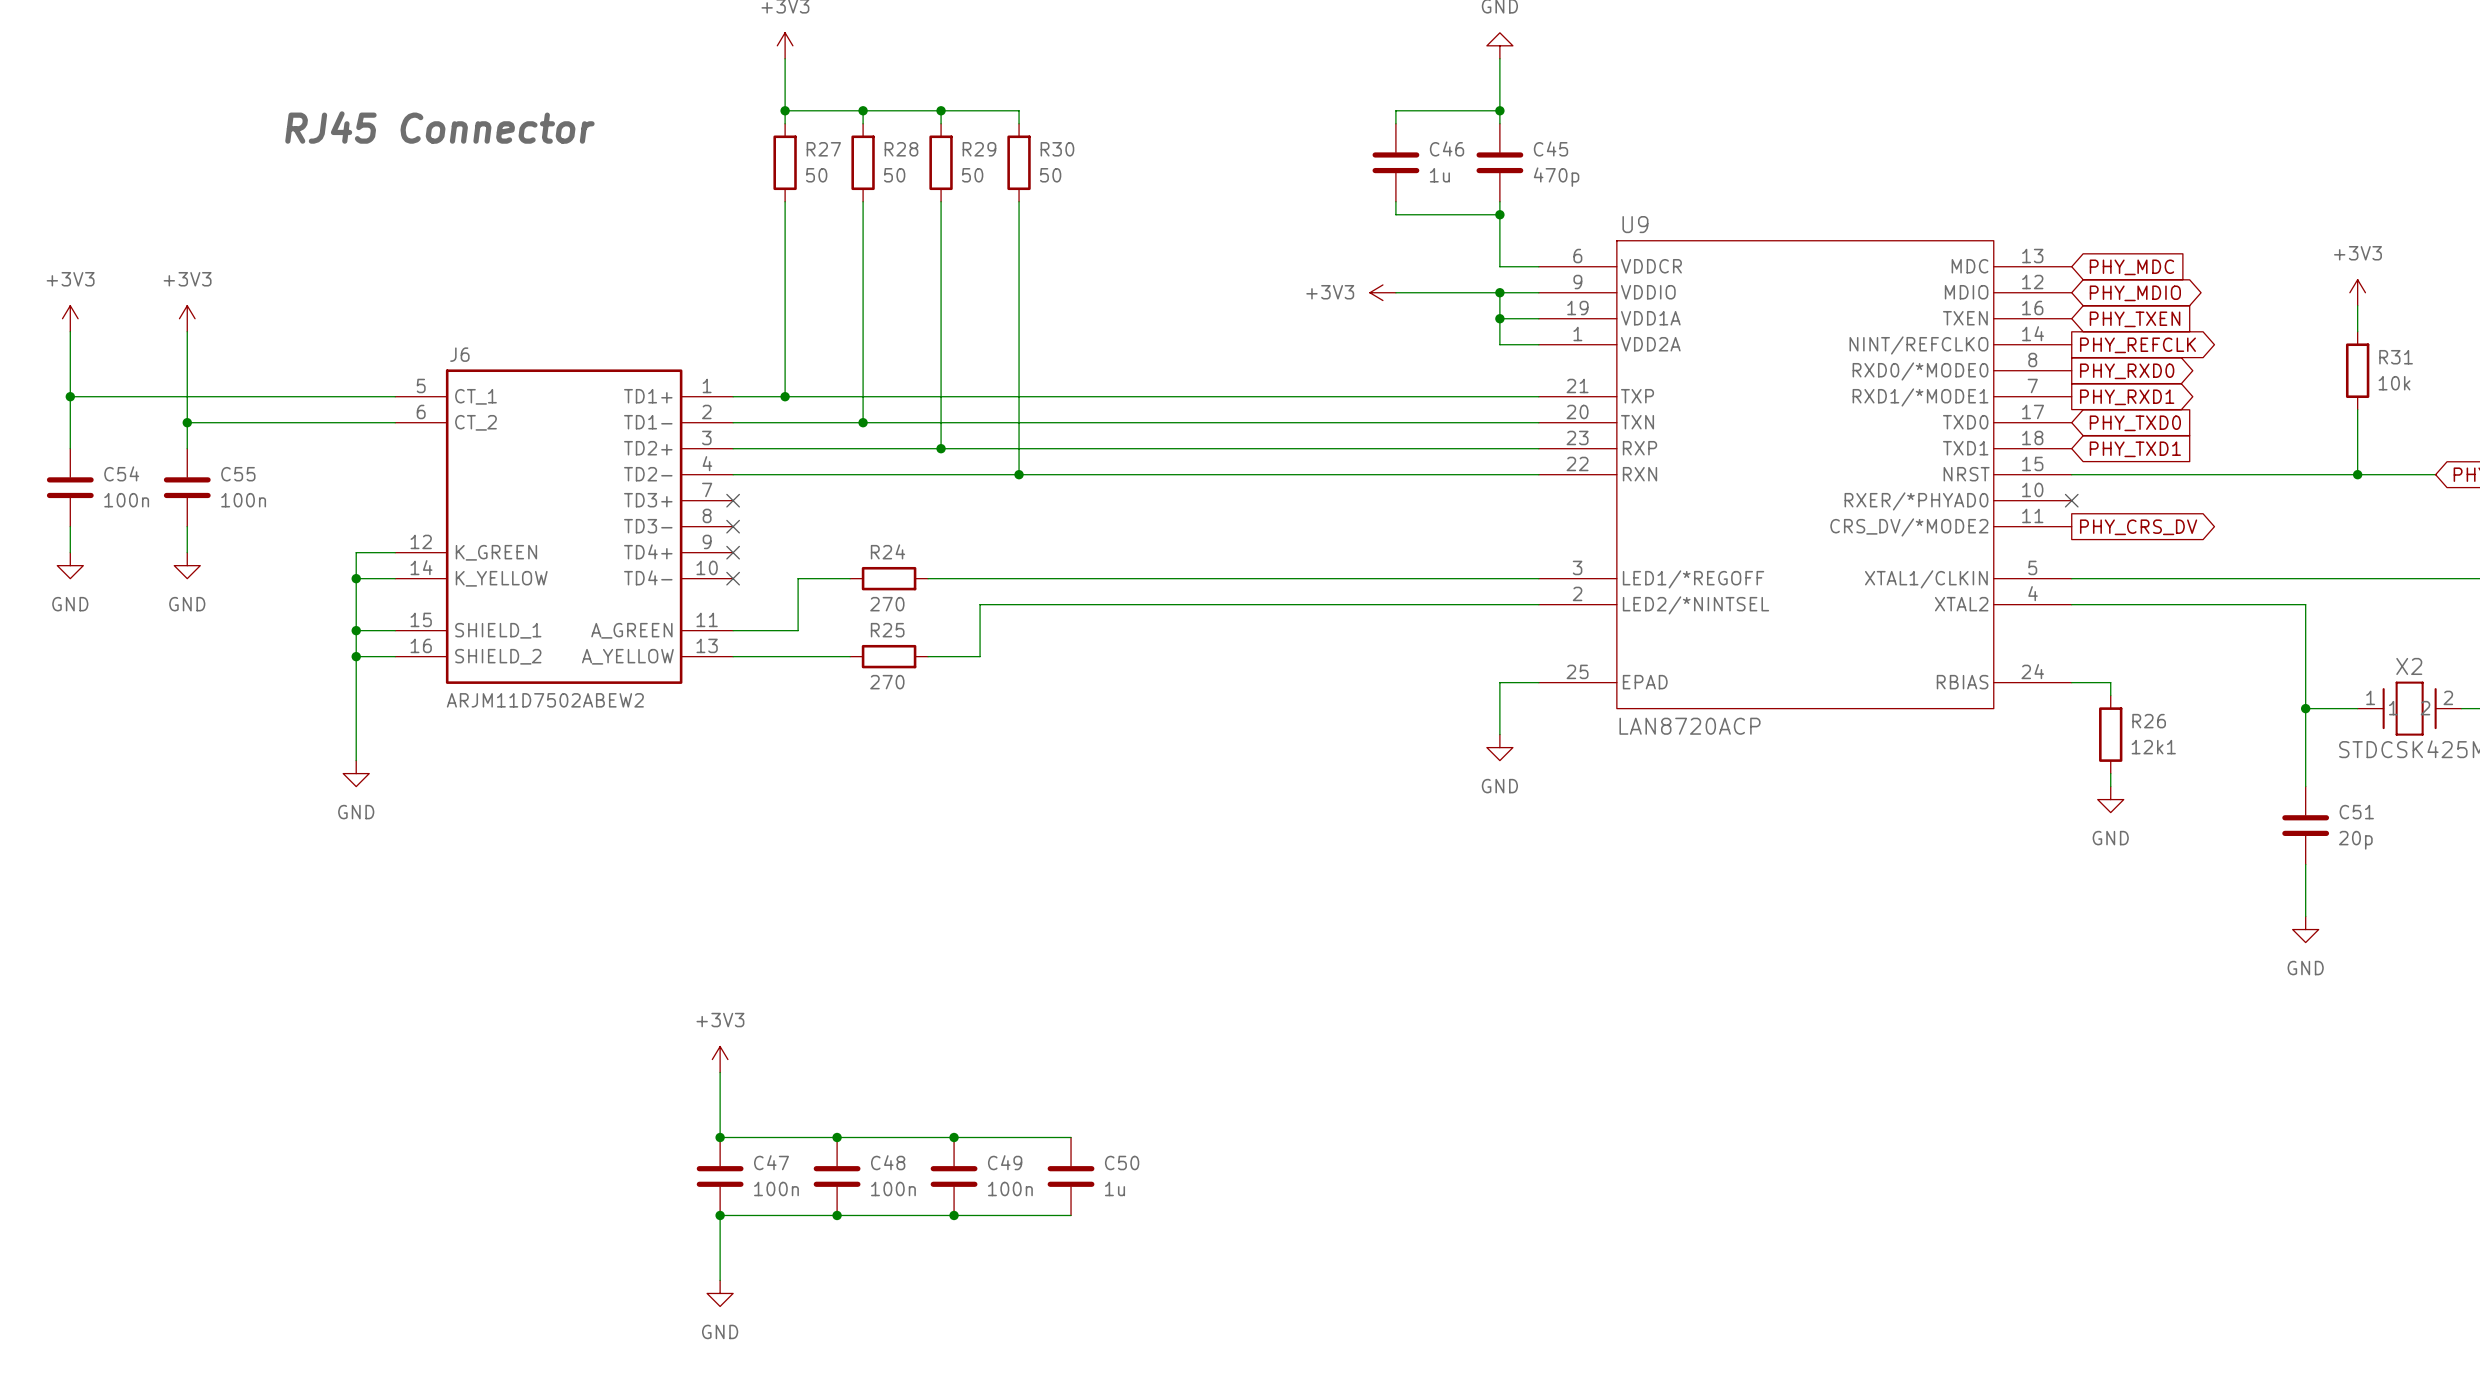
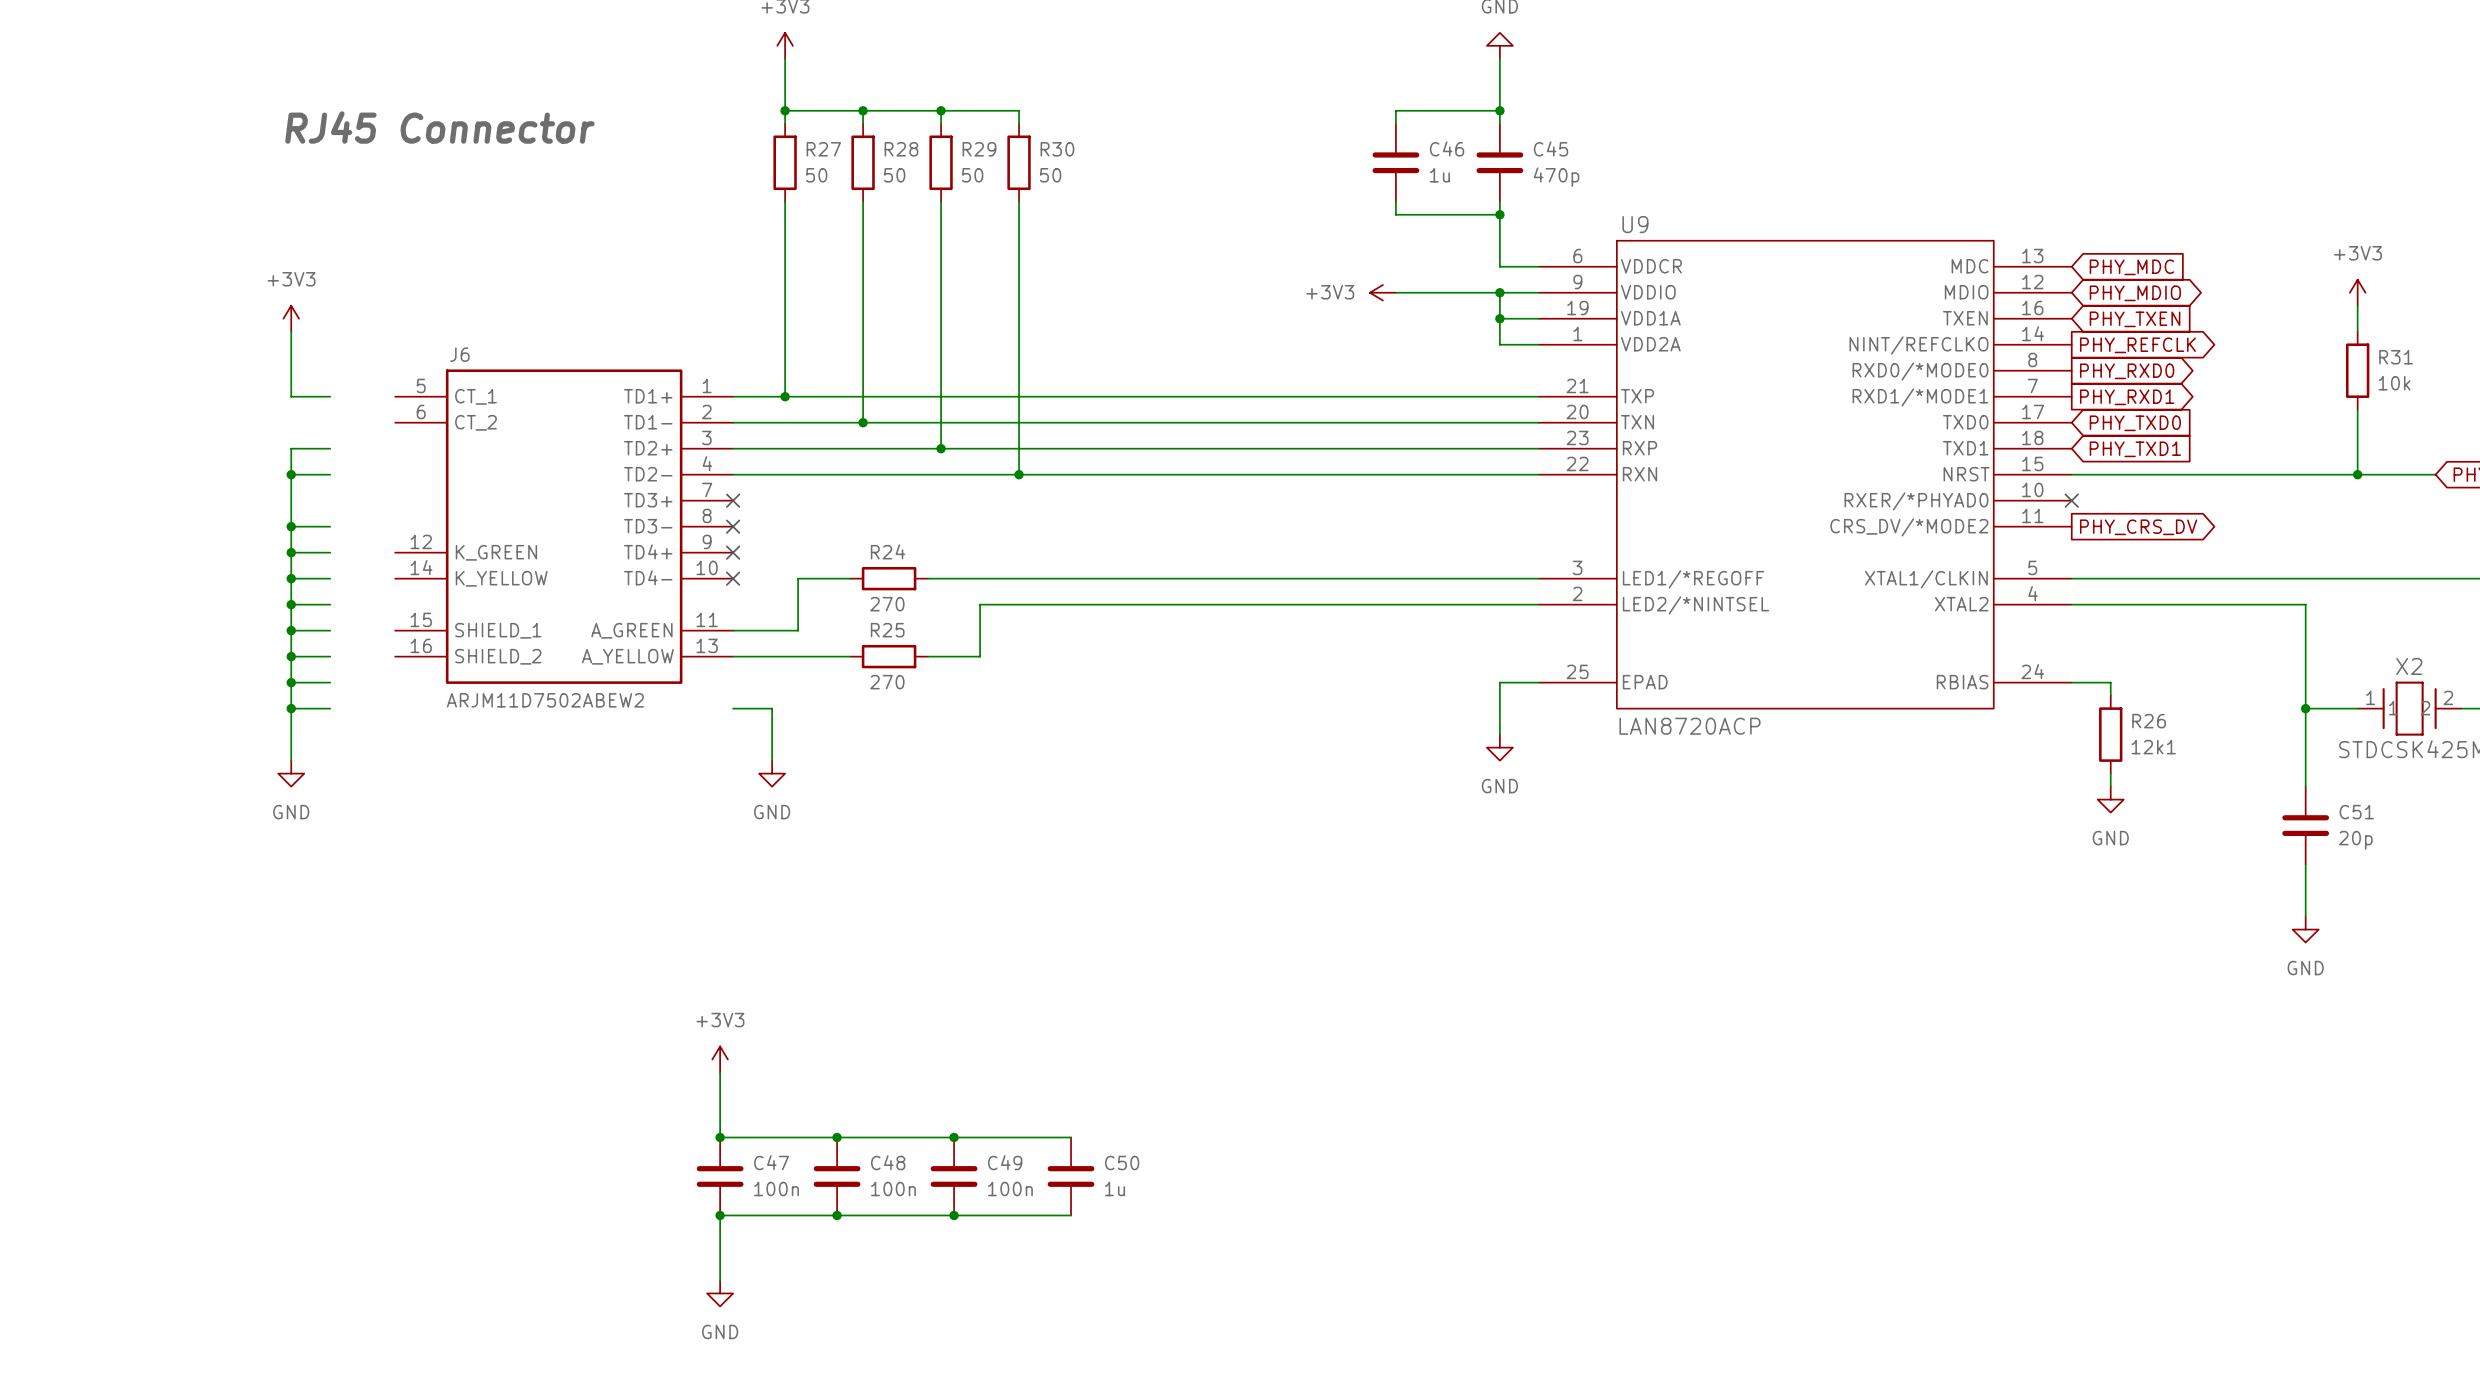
power symbol: +3V3 (70, 318) -> none
power symbol position: +3V3 (187, 318) -> +3V3 (291, 318)
wire: (70, 331) (70, 448) -> none
wire: (187, 331) (187, 448) -> none
wire: (70, 396) (291, 396) -> (291, 331) (291, 396)
junction: (70, 396) -> none
wire: (330, 396) (395, 396) -> none
wire: (187, 422) (395, 422) -> none
junction: (187, 422) -> none
wire: none -> (330, 448) (291, 448) (291, 760)
wire: none -> (291, 474) (330, 474)
junction: none -> (291, 474)
C54: 100n (70, 487) -> none
C55: 100n (187, 487) -> none
wire: (70, 526) (70, 552) -> none
wire: (187, 526) (187, 552) -> none
wire: none -> (291, 526) (330, 526)
junction: none -> (291, 526)
wire: none -> (291, 552) (330, 552)
junction: none -> (291, 552)
wire: (395, 552) (356, 552) (356, 760) -> none
power symbol: GND (70, 565) -> none
power symbol: GND (187, 565) -> none
junction: none -> (291, 578)
wire: (356, 578) (395, 578) -> (291, 578) (330, 578)
junction: (356, 578) -> none
wire: none -> (291, 604) (330, 604)
junction: none -> (291, 604)
junction: none -> (291, 630)
wire: (356, 630) (395, 630) -> (291, 630) (330, 630)
junction: (356, 630) -> none
junction: none -> (291, 656)
wire: (356, 656) (395, 656) -> (291, 656) (330, 656)
junction: (356, 656) -> none
wire: none -> (291, 682) (330, 682)
junction: none -> (291, 682)
wire: none -> (291, 708) (330, 708)
junction: none -> (291, 708)
wire: none -> (733, 708) (772, 708) (772, 760)
power symbol position: GND (356, 773) -> GND (291, 773)
power symbol: none -> GND (772, 773)

